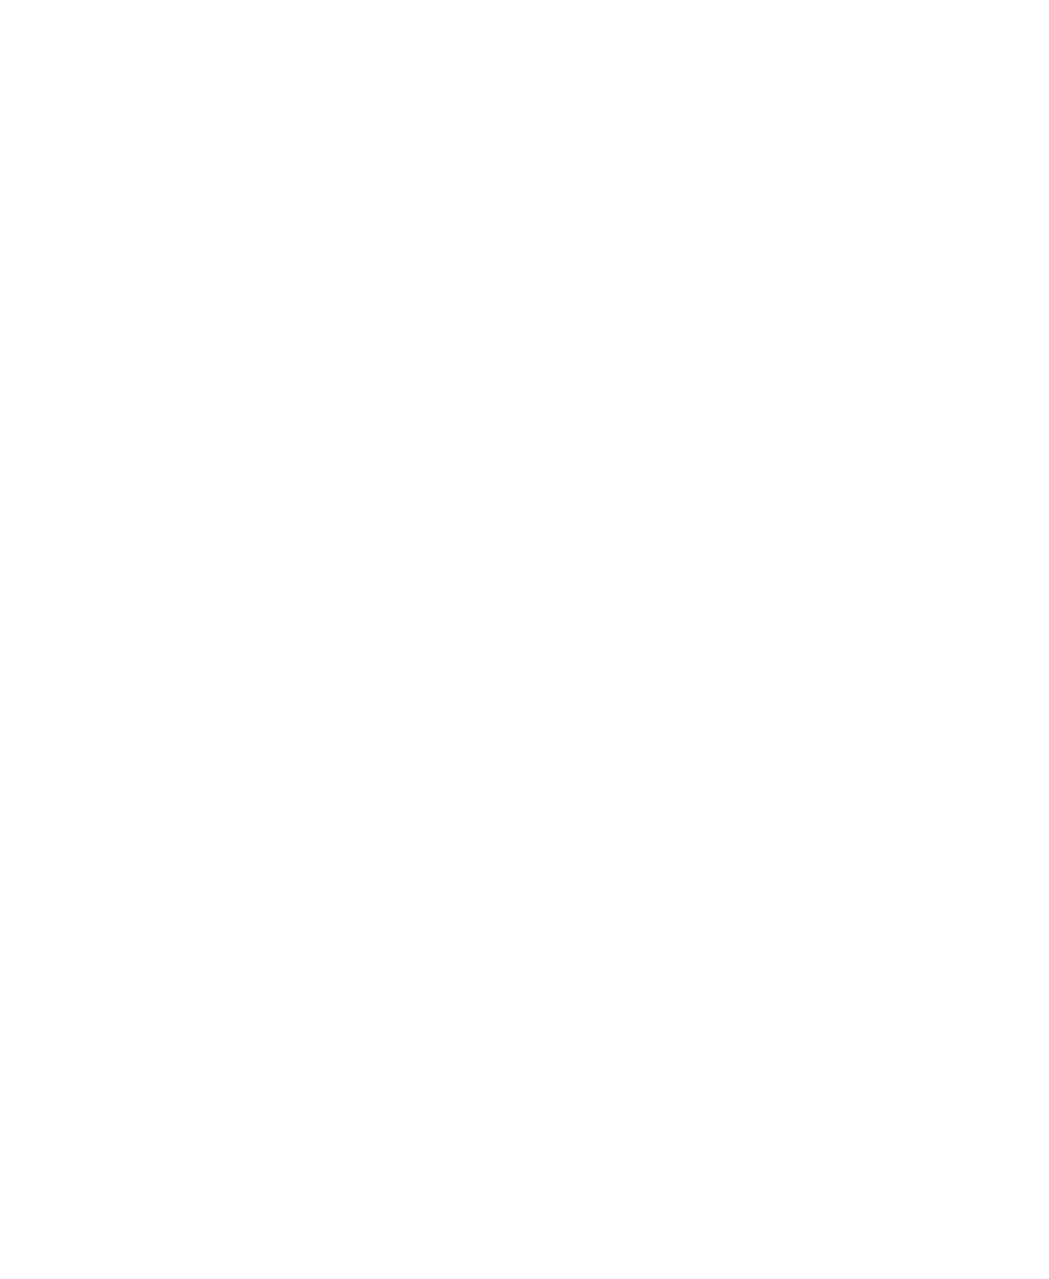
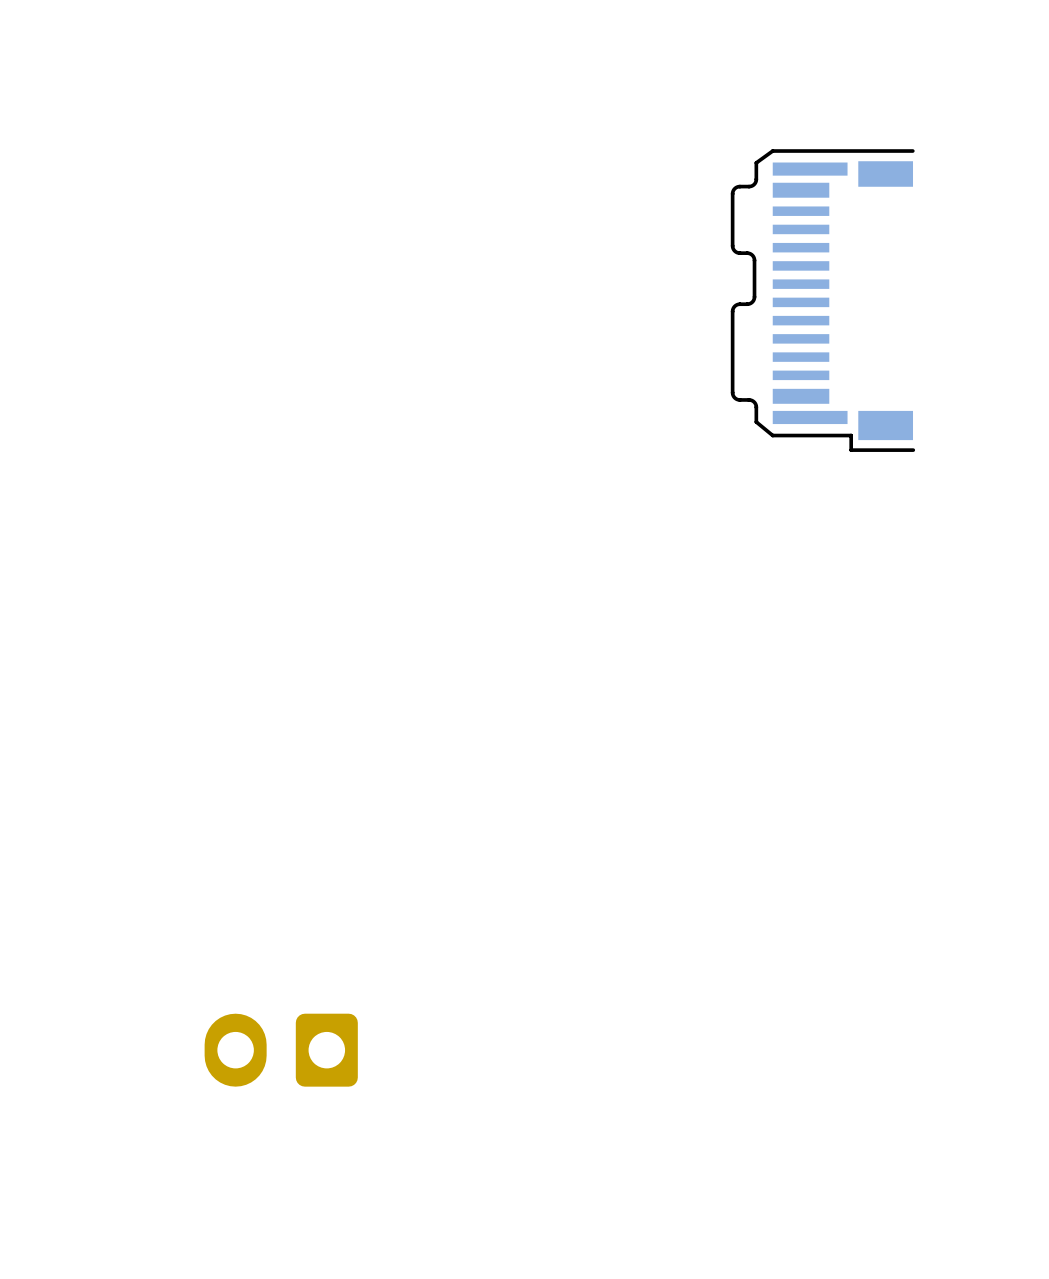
part: none -> (822, 300)
part: none -> (281, 1050)

